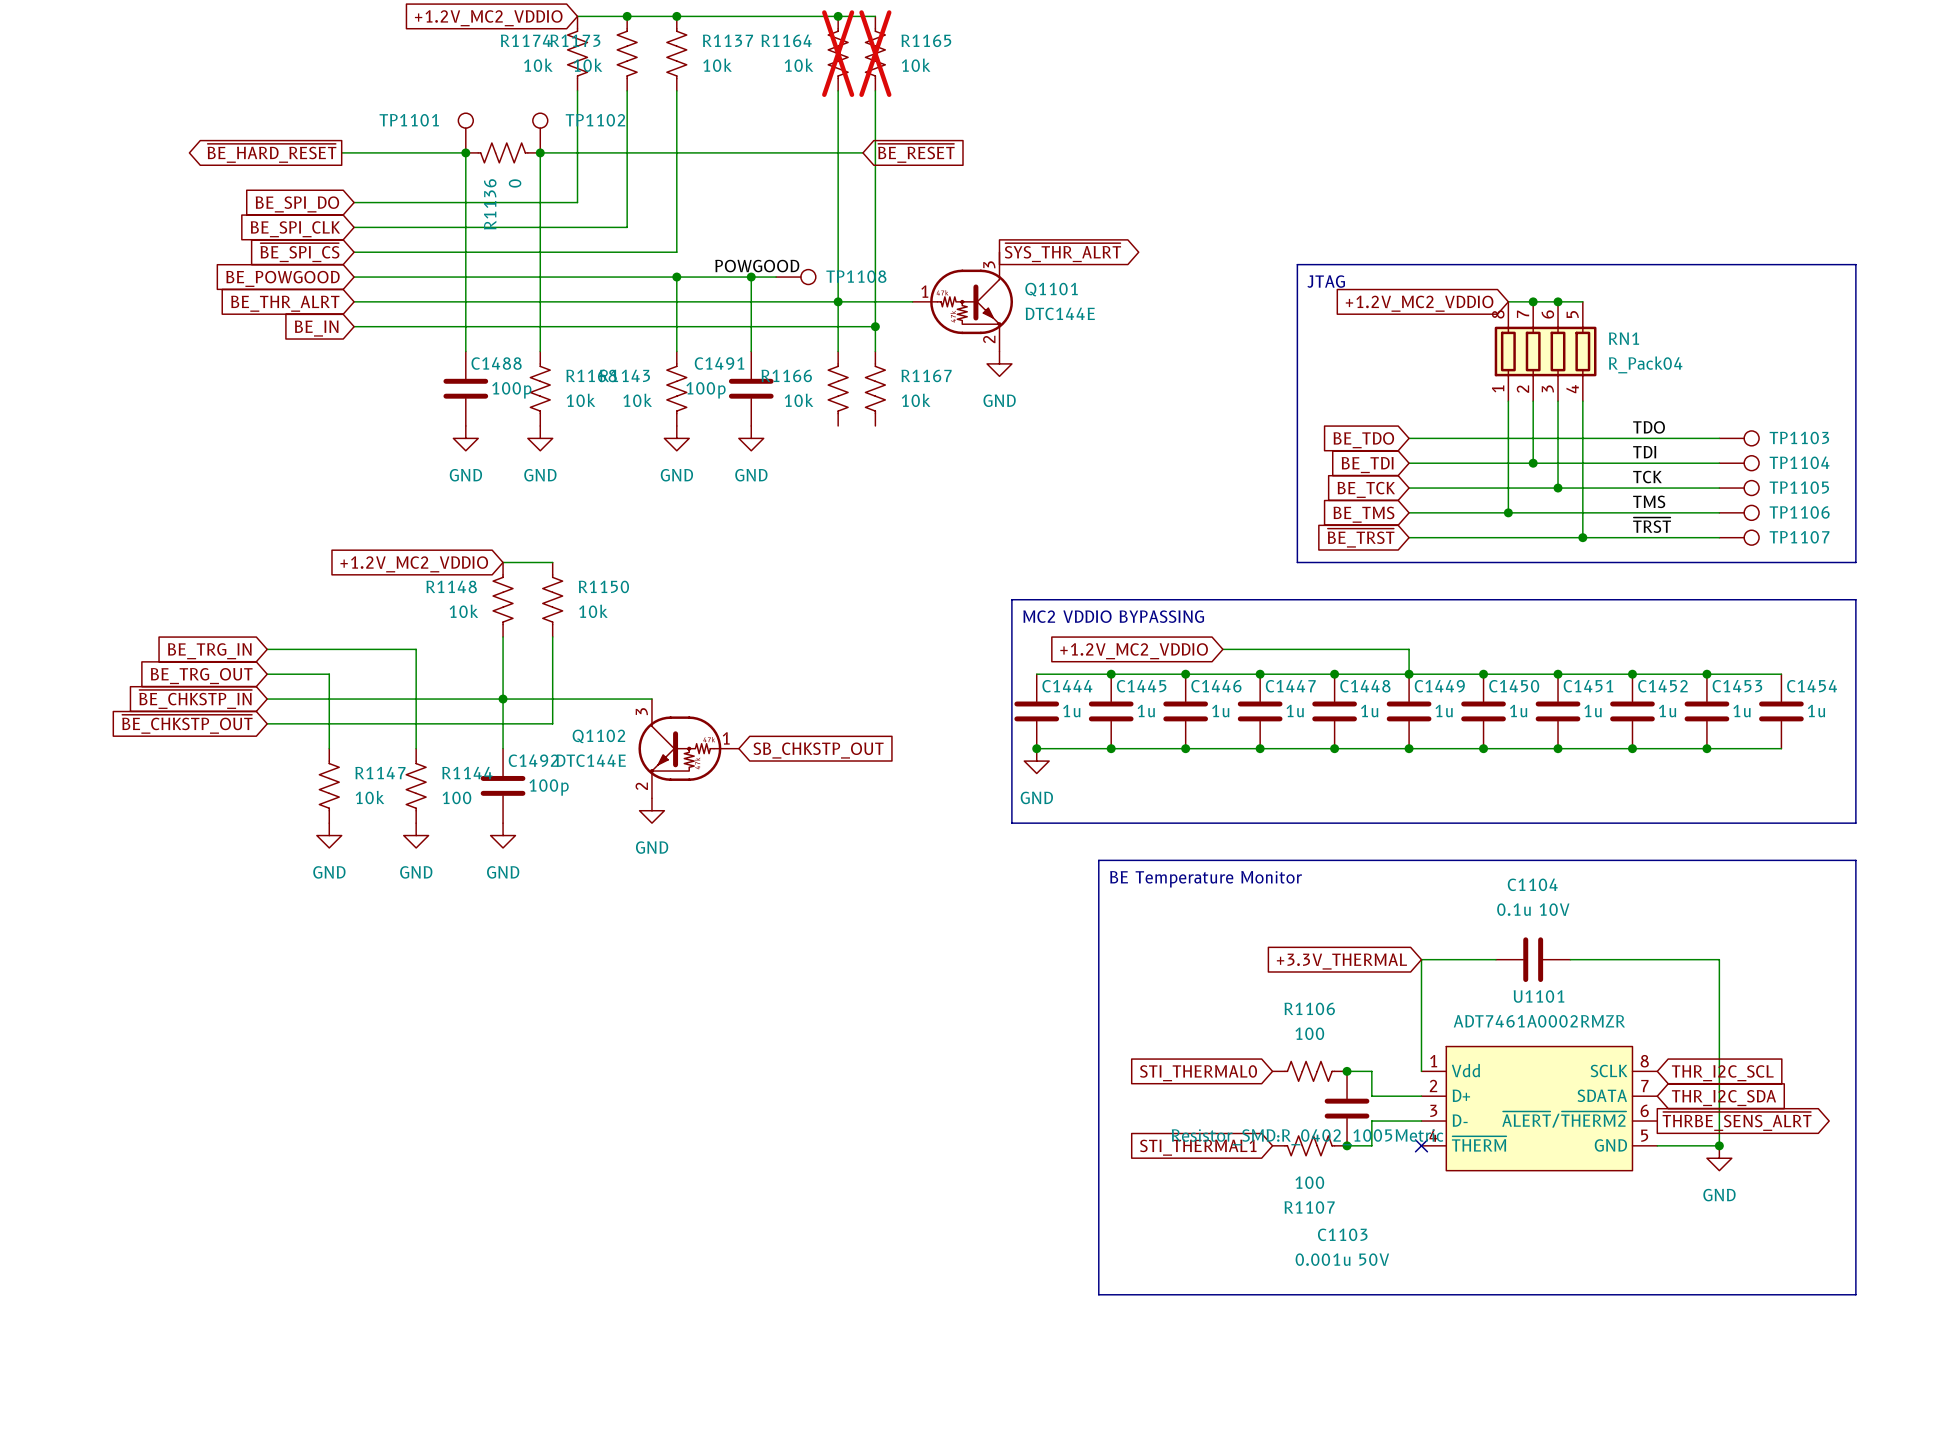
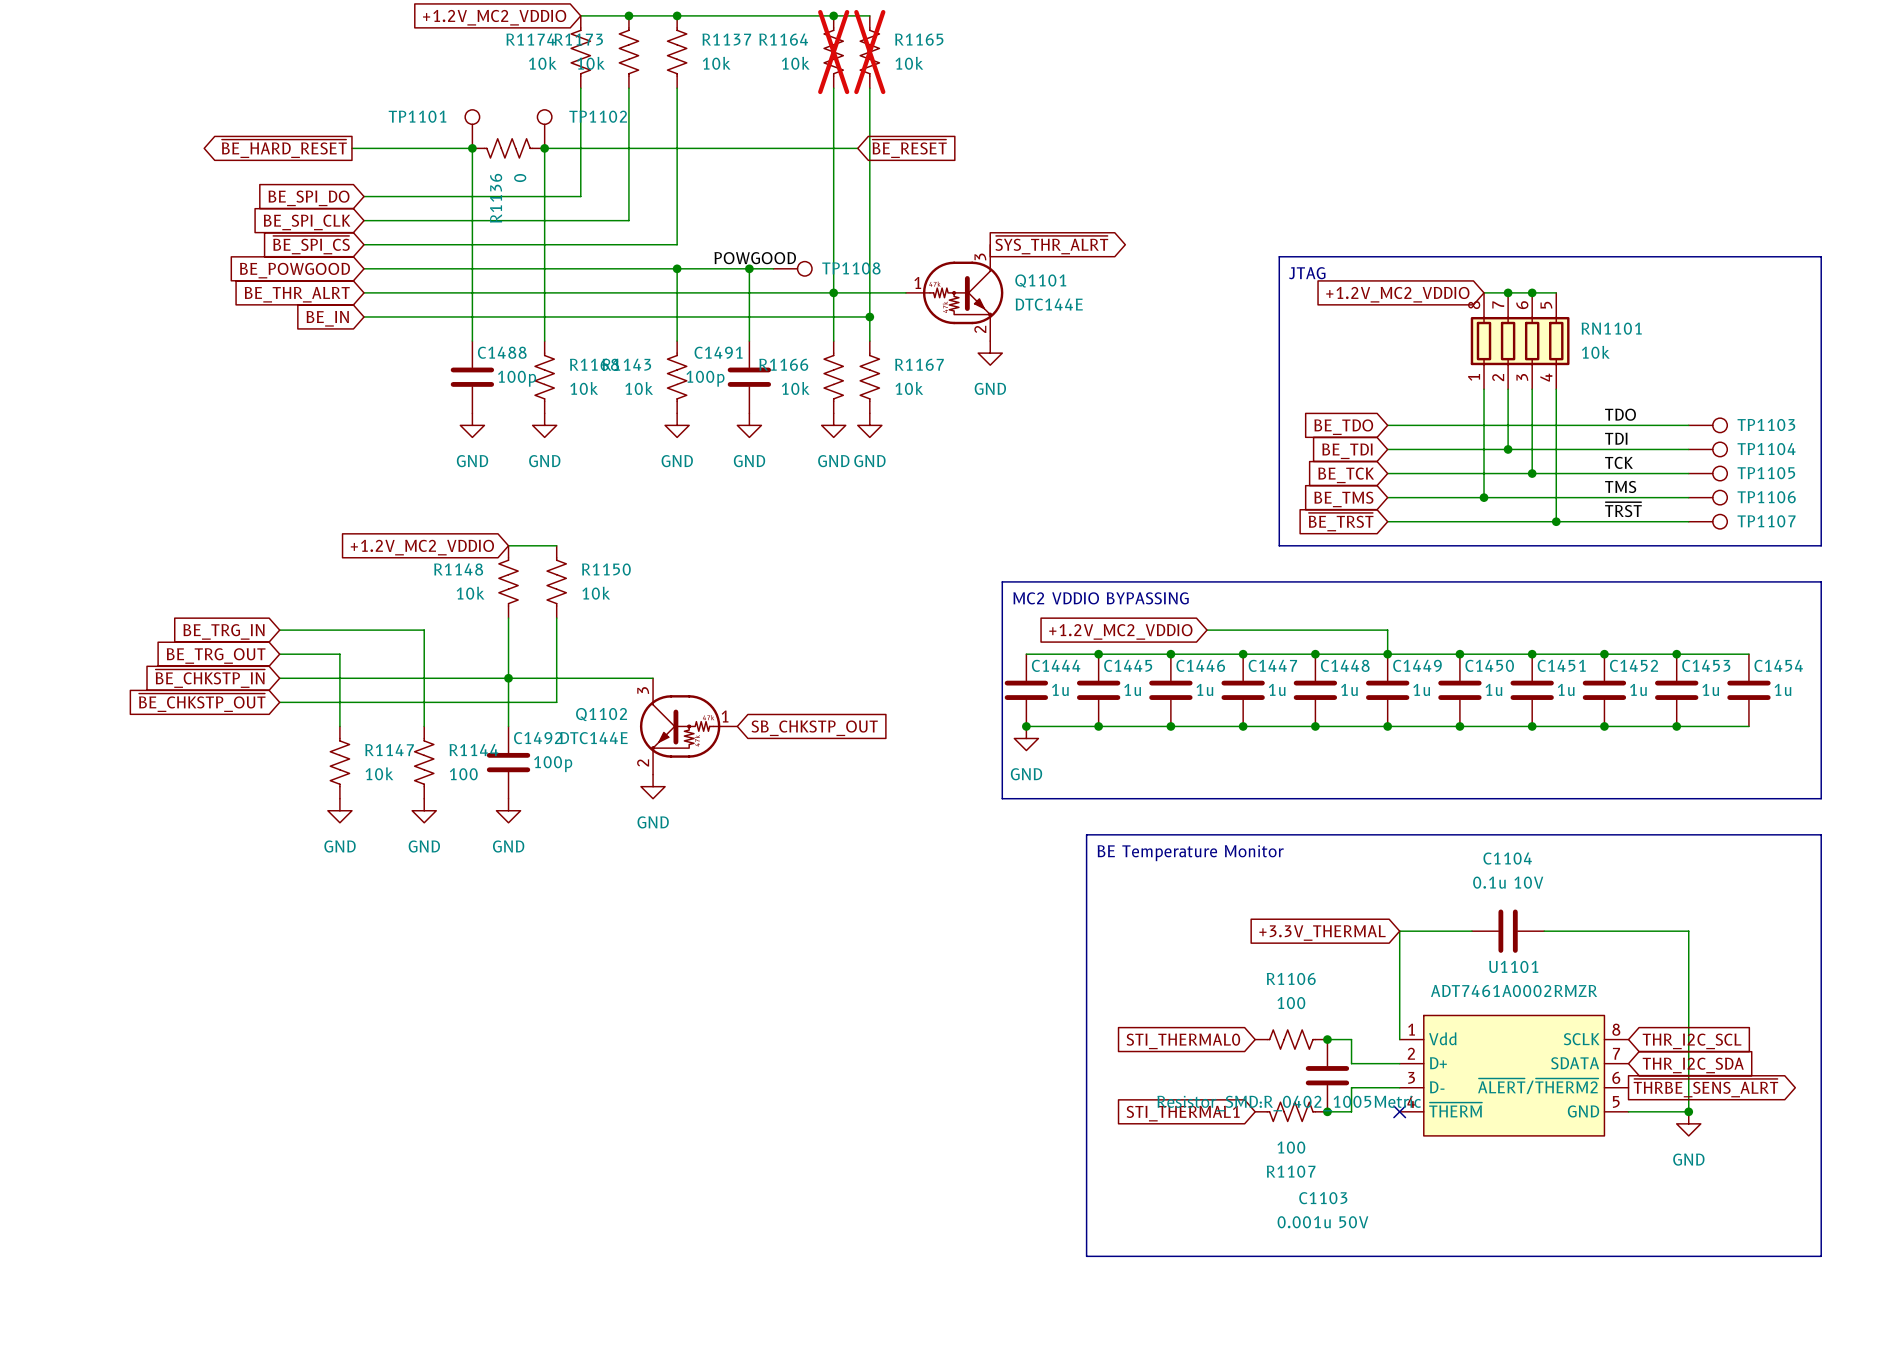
RN1 name: RN1 (1624, 338) -> RN1101 (1611, 328)
RN1 value: R_Pack04 (1645, 364) -> 10k (1595, 352)
power symbol: none -> GND (833, 425)
power symbol: none -> GND (869, 425)

